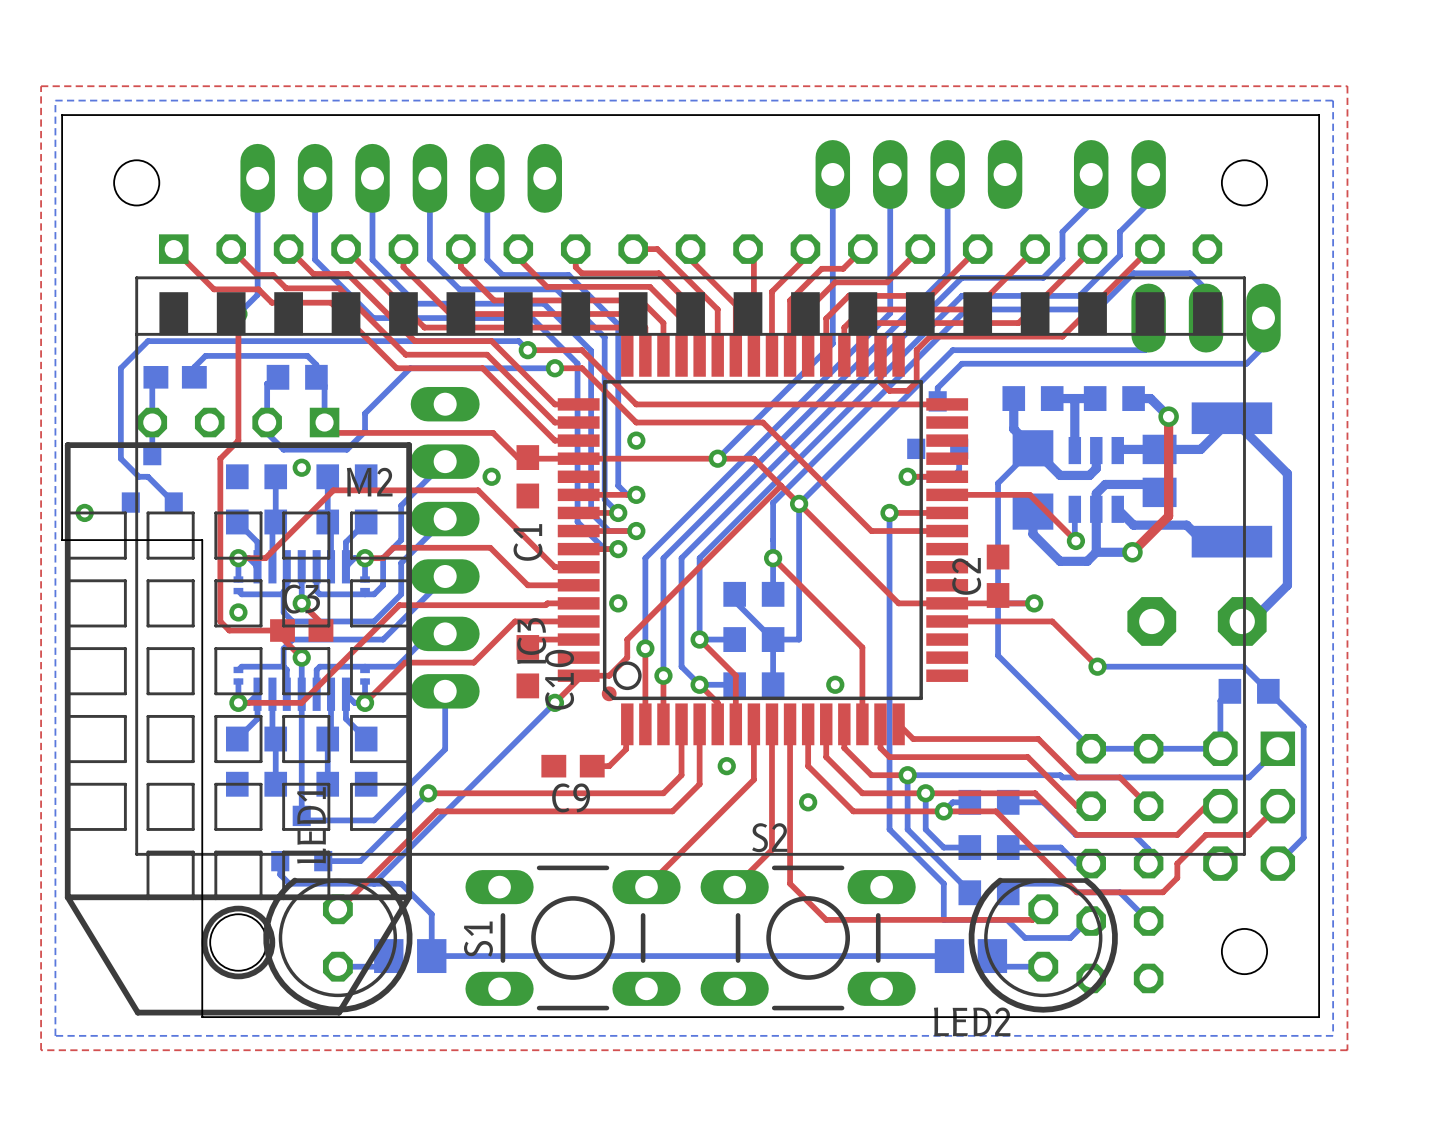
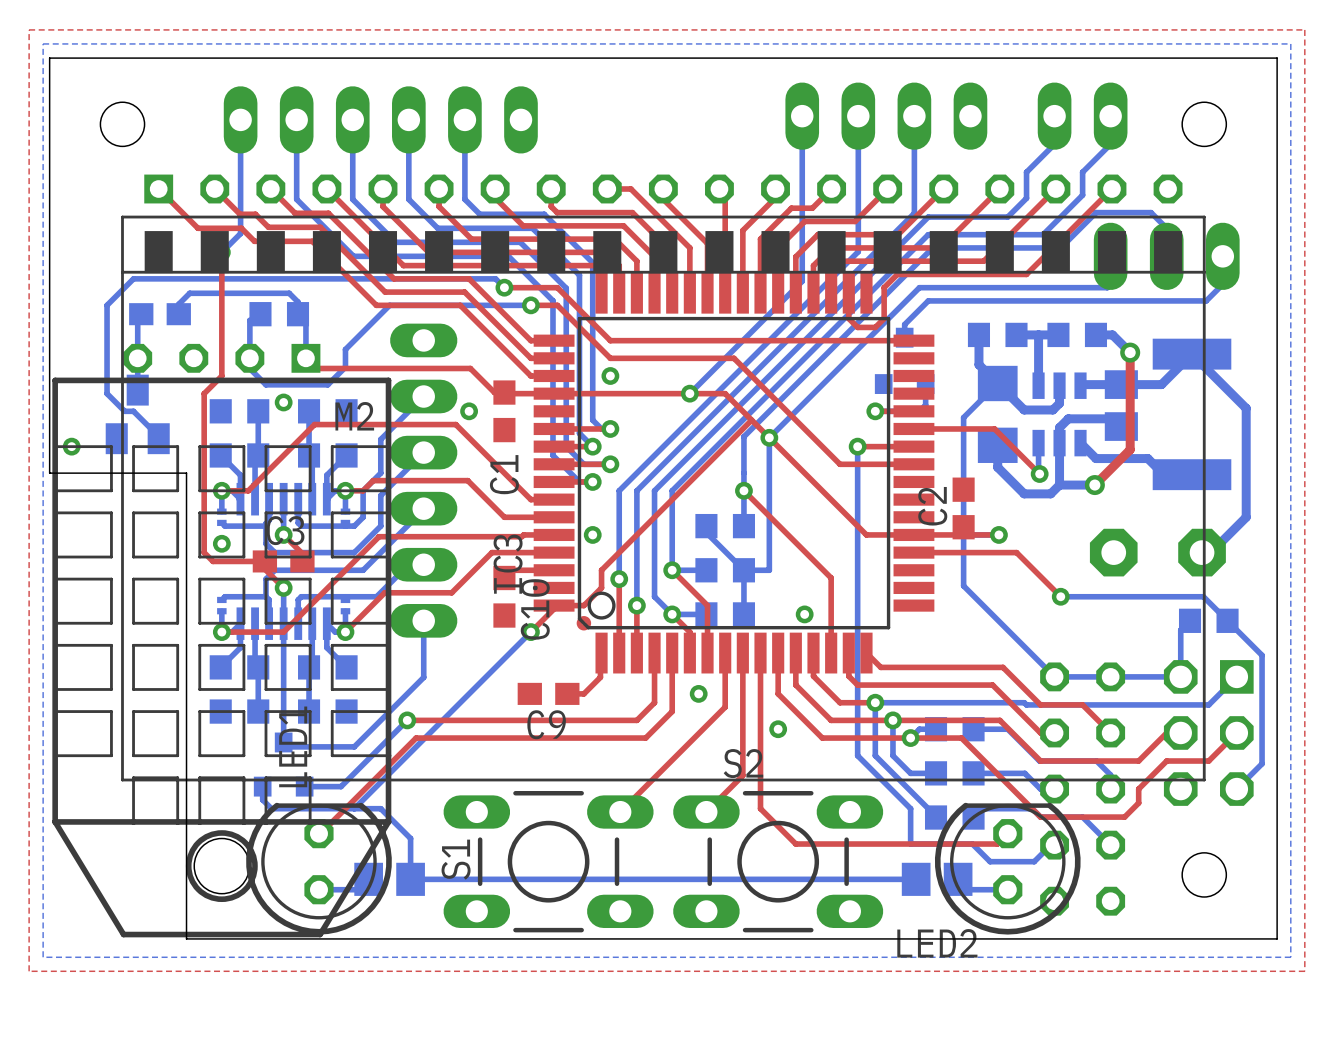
part footprint: [121, 444, 183, 513] -> [105, 374, 170, 455]

